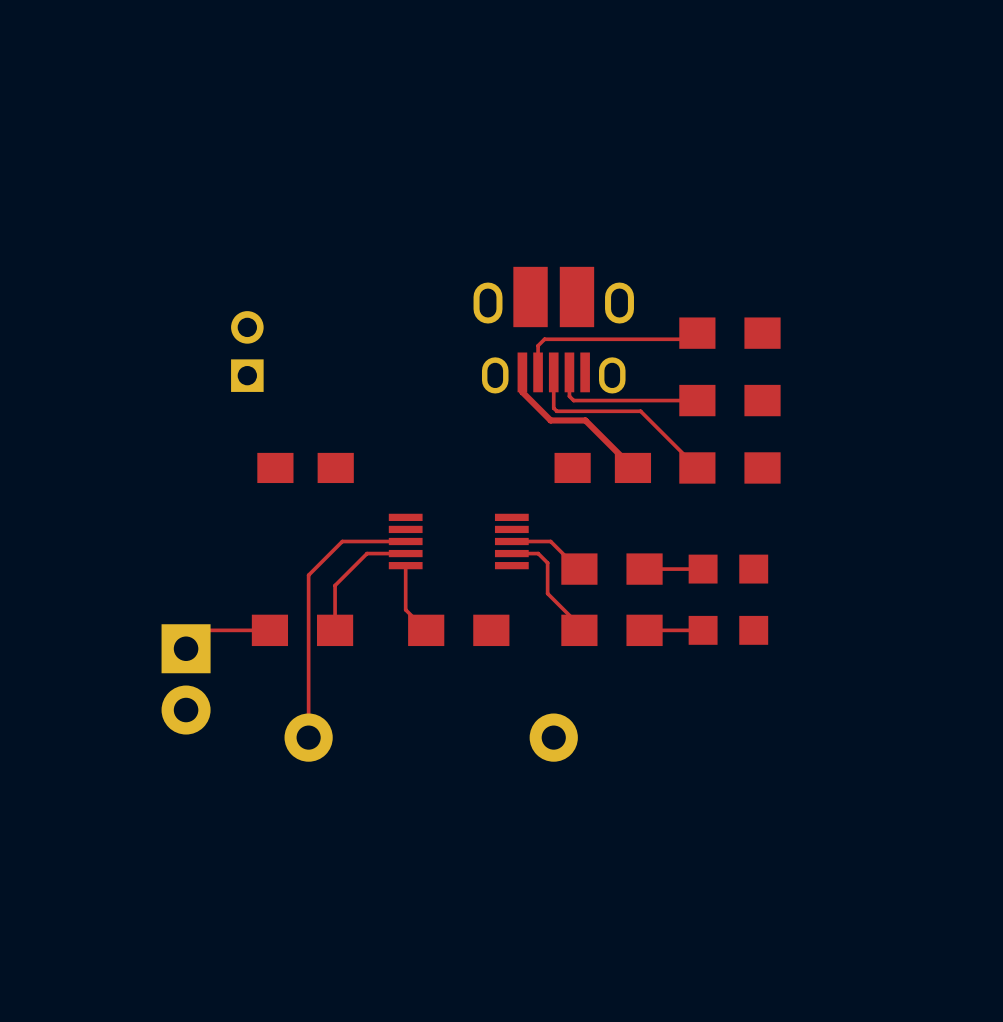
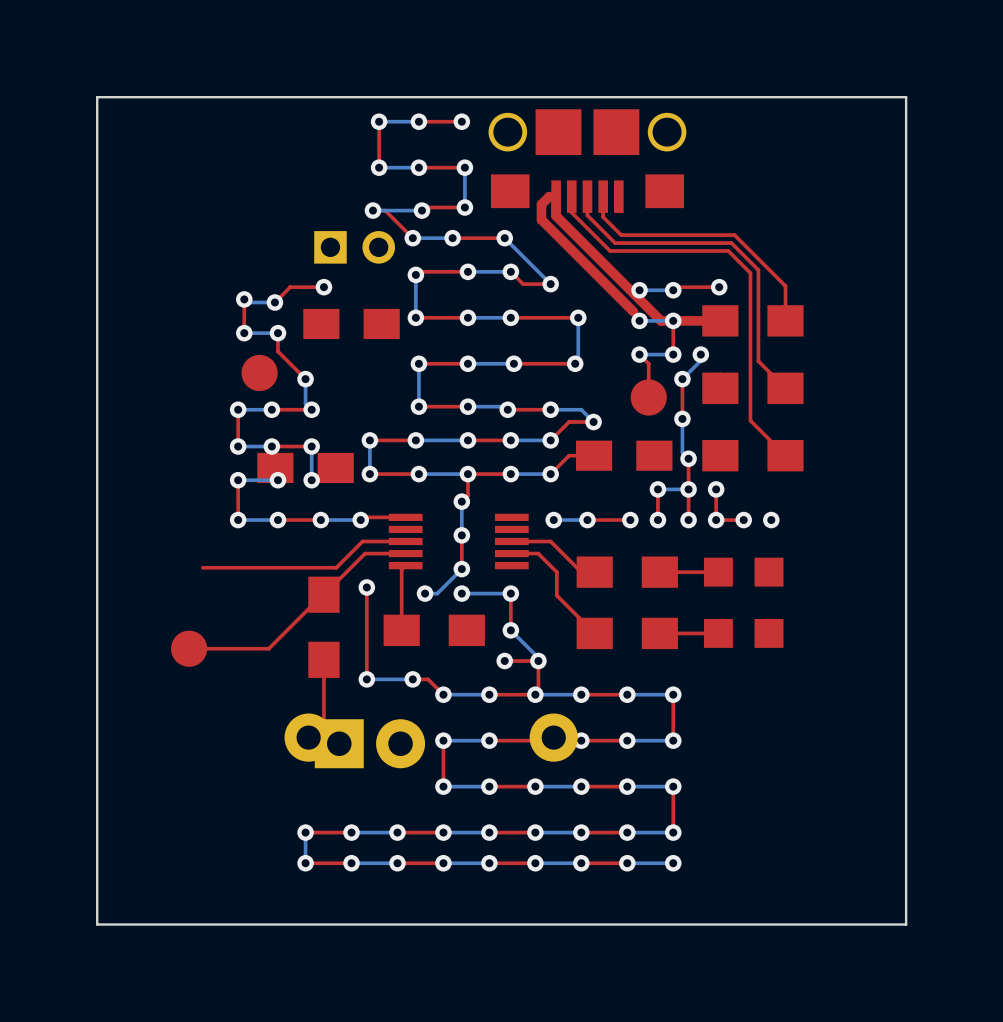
board edge: none -> (906, 97) (906, 924) (97, 924) (97, 97) (906, 97)
top track: none -> (379, 121) (379, 167)
via: none -> (379, 121)
bottom track: none -> (418, 121) (379, 121)
via: none -> (418, 121)
top track: none -> (461, 121) (418, 121)
via: none -> (461, 121)
part: none -> (587, 161)
via: none -> (379, 167)
bottom track: none -> (418, 167) (379, 167)
via: none -> (418, 167)
top track: none -> (464, 167) (418, 167)
bottom track: none -> (464, 167) (464, 207)
via: none -> (464, 167)
top track: none -> (571, 196) (571, 212) (610, 251) (728, 251) (750, 273) (750, 420) (785, 455)
top track: none -> (587, 196) (587, 215) (615, 243) (731, 243) (758, 270) (758, 361) (785, 388)
top track: none -> (603, 196) (603, 217) (621, 235) (734, 235) (785, 286) (785, 320)
top track: none -> (464, 207) (425, 207) (422, 210)
via: none -> (464, 207)
top track: none -> (372, 210) (385, 210) (412, 238)
via: none -> (372, 210)
bottom track: none -> (422, 210) (372, 210)
via: none -> (422, 210)
via: none -> (412, 238)
bottom track: none -> (452, 238) (412, 238)
via: none -> (452, 238)
top track: none -> (504, 238) (452, 238)
bottom track: none -> (504, 238) (550, 284)
via: none -> (504, 238)
top track: none -> (467, 271) (418, 271) (415, 274)
via: none -> (467, 271)
top track: none -> (510, 271) (523, 284) (550, 284)
bottom track: none -> (510, 271) (467, 271)
via: none -> (510, 271)
bottom track: none -> (415, 274) (415, 317)
via: none -> (415, 274)
via: none -> (550, 284)
top track: none -> (323, 287) (290, 287) (274, 302)
via: none -> (323, 287)
top track: none -> (719, 287) (676, 287) (673, 290)
via: none -> (719, 287)
via: none -> (639, 290)
bottom track: none -> (673, 290) (639, 290)
via: none -> (673, 290)
top track: none -> (244, 299) (244, 333)
bottom track: none -> (244, 299) (247, 302) (274, 302)
via: none -> (244, 299)
via: none -> (274, 302)
top track: none -> (633, 311) (541, 219) (541, 204) (549, 196) (556, 196) (556, 215) (661, 320) (720, 320)
via: none -> (415, 317)
top track: none -> (467, 317) (415, 317)
via: none -> (467, 317)
bottom track: none -> (510, 317) (467, 317)
via: none -> (510, 317)
top track: none -> (578, 317) (510, 317)
bottom track: none -> (578, 317) (578, 360) (575, 363)
via: none -> (578, 317)
via: none -> (639, 320)
top track: none -> (673, 320) (673, 354)
bottom track: none -> (673, 320) (639, 320)
via: none -> (673, 320)
part: none -> (351, 323)
part: (553, 330) -> none
via: none -> (244, 333)
top track: none -> (277, 333) (277, 351) (305, 379)
bottom track: none -> (277, 333) (244, 333)
via: none -> (277, 333)
top track: (697, 333) (691, 339) (544, 339) (538, 345) (538, 372) -> none
part position: (729, 333) -> (752, 320)
part rotation: 0° (247, 351) -> 90° clockwise (354, 247)
part position: (247, 351) -> (354, 247)
top track: none -> (639, 354) (648, 363) (648, 397)
via: none -> (639, 354)
bottom track: none -> (673, 354) (639, 354)
via: none -> (673, 354)
bottom track: none -> (700, 354) (700, 360) (682, 379)
via: none -> (700, 354)
bottom track: none -> (418, 363) (418, 406)
via: none -> (418, 363)
top track: none -> (467, 363) (418, 363)
via: none -> (467, 363)
bottom track: none -> (513, 363) (467, 363)
via: none -> (513, 363)
top track: none -> (575, 363) (513, 363)
via: none -> (575, 363)
part: none -> (259, 372)
top track: (522, 372) (522, 392) (550, 420) (585, 420) (632, 467) -> none
top track: (553, 372) (553, 408) (556, 411) (640, 411) (697, 467) -> none
top track: (569, 372) (569, 396) (573, 400) (697, 400) -> none
bottom track: none -> (305, 379) (305, 403) (311, 409)
via: none -> (305, 379)
top track: none -> (682, 379) (682, 418)
via: none -> (682, 379)
part: none -> (648, 397)
part position: (729, 400) -> (752, 388)
via: none -> (418, 406)
top track: none -> (467, 406) (418, 406)
bottom track: none -> (467, 406) (504, 406) (507, 409)
via: none -> (467, 406)
top track: none -> (238, 409) (238, 446)
via: none -> (238, 409)
bottom track: none -> (271, 409) (238, 409)
via: none -> (271, 409)
top track: none -> (311, 409) (271, 409)
via: none -> (311, 409)
via: none -> (507, 409)
top track: none -> (550, 409) (507, 409)
bottom track: none -> (550, 409) (581, 409) (593, 422)
via: none -> (550, 409)
bottom track: none -> (682, 418) (682, 452) (688, 458)
via: none -> (682, 418)
top track: none -> (593, 422) (569, 422) (550, 440)
via: none -> (593, 422)
bottom track: none -> (369, 440) (369, 474)
via: none -> (369, 440)
top track: none -> (415, 440) (369, 440)
via: none -> (415, 440)
bottom track: none -> (467, 440) (415, 440)
via: none -> (467, 440)
top track: none -> (510, 440) (467, 440)
via: none -> (510, 440)
bottom track: none -> (550, 440) (510, 440)
via: none -> (550, 440)
via: none -> (238, 446)
bottom track: none -> (271, 446) (238, 446)
via: none -> (271, 446)
top track: none -> (311, 446) (271, 446)
bottom track: none -> (311, 446) (311, 480)
via: none -> (311, 446)
top track: none -> (594, 455) (569, 455) (550, 474)
top track: none -> (688, 458) (688, 520)
via: none -> (688, 458)
part position: (602, 467) -> (624, 455)
part position: (729, 467) -> (752, 455)
via: none -> (369, 474)
top track: none -> (418, 474) (369, 474)
via: none -> (418, 474)
bottom track: none -> (467, 474) (418, 474)
via: none -> (467, 474)
top track: none -> (510, 474) (467, 474) (467, 495) (461, 501)
via: none -> (510, 474)
bottom track: none -> (550, 474) (510, 474)
via: none -> (550, 474)
top track: none -> (238, 480) (238, 520)
via: none -> (238, 480)
bottom track: none -> (277, 480) (238, 480)
via: none -> (277, 480)
via: none -> (311, 480)
top track: none -> (657, 489) (657, 520)
via: none -> (657, 489)
bottom track: none -> (688, 489) (657, 489)
via: none -> (688, 489)
top track: none -> (716, 489) (716, 520) (743, 520)
via: none -> (716, 489)
bottom track: none -> (461, 501) (461, 535)
via: none -> (461, 501)
top track: none -> (405, 517) (363, 517) (360, 520)
via: none -> (238, 520)
bottom track: none -> (277, 520) (238, 520)
via: none -> (277, 520)
top track: none -> (320, 520) (277, 520)
via: none -> (320, 520)
bottom track: none -> (360, 520) (320, 520)
via: none -> (360, 520)
via: none -> (553, 520)
bottom track: none -> (587, 520) (553, 520)
via: none -> (587, 520)
top track: none -> (630, 520) (587, 520)
via: none -> (630, 520)
via: none -> (657, 520)
via: none -> (688, 520)
via: none -> (716, 520)
via: none -> (743, 520)
via: none -> (771, 520)
top track: none -> (461, 535) (461, 569)
via: none -> (461, 535)
top track: (362, 541) (342, 541) (308, 575) (308, 737) -> (362, 541) (336, 567) (202, 567)
top track: (367, 553) (335, 585) (335, 630) -> (367, 553) (268, 648) (189, 648)
top track: (547, 562) (547, 593) (579, 625) -> (547, 562) (556, 572) (556, 595) (594, 633)
top track: (405, 565) (405, 609) (426, 630) -> (405, 565) (401, 569) (401, 630)
bottom track: none -> (461, 569) (437, 593) (425, 593)
via: none -> (461, 569)
part position: (611, 569) -> (627, 572)
top track: (703, 569) (644, 569) -> (718, 572) (659, 572)
part position: (728, 569) -> (743, 572)
top track: none -> (366, 587) (366, 679)
via: none -> (366, 587)
via: none -> (425, 593)
via: none -> (461, 593)
top track: none -> (510, 593) (510, 630)
bottom track: none -> (510, 593) (461, 593)
via: none -> (510, 593)
top track: (269, 630) (204, 630) (186, 648) -> none
part rotation: 0° (302, 630) -> 90° clockwise (323, 627)
part position: (458, 630) -> (434, 630)
bottom track: none -> (510, 630) (538, 657) (538, 661)
via: none -> (510, 630)
part position: (611, 630) -> (627, 633)
top track: (703, 630) (644, 630) -> (718, 633) (659, 633)
part position: (728, 630) -> (743, 633)
part: none -> (189, 648)
top track: none -> (323, 659) (323, 728) (339, 743)
top track: none -> (504, 661) (538, 661) (538, 691) (535, 694) (489, 694)
via: none -> (504, 661)
via: none -> (538, 661)
part rotation: 0° (186, 679) -> 90° counterclockwise (369, 743)
part position: (186, 679) -> (369, 743)
via: none -> (366, 679)
top track: none -> (412, 679) (428, 679) (443, 694)
bottom track: none -> (412, 679) (366, 679)
via: none -> (412, 679)
via: none -> (443, 694)
bottom track: none -> (489, 694) (443, 694)
via: none -> (489, 694)
via: none -> (535, 694)
bottom track: none -> (581, 694) (535, 694)
via: none -> (581, 694)
top track: none -> (627, 694) (581, 694)
via: none -> (627, 694)
top track: none -> (673, 694) (673, 740)
bottom track: none -> (673, 694) (627, 694)
via: none -> (673, 694)
top track: none -> (443, 740) (443, 786)
via: none -> (443, 740)
bottom track: none -> (489, 740) (443, 740)
via: none -> (489, 740)
top track: none -> (535, 740) (489, 740)
via: none -> (581, 740)
top track: none -> (627, 740) (581, 740)
via: none -> (627, 740)
bottom track: none -> (673, 740) (627, 740)
via: none -> (673, 740)
via: none -> (443, 786)
bottom track: none -> (489, 786) (443, 786)
via: none -> (489, 786)
top track: none -> (535, 786) (489, 786)
via: none -> (535, 786)
bottom track: none -> (581, 786) (535, 786)
via: none -> (581, 786)
top track: none -> (627, 786) (581, 786)
via: none -> (627, 786)
top track: none -> (673, 786) (673, 832)
bottom track: none -> (673, 786) (627, 786)
via: none -> (673, 786)
bottom track: none -> (305, 832) (305, 863)
via: none -> (305, 832)
top track: none -> (351, 832) (305, 832)
via: none -> (351, 832)
bottom track: none -> (397, 832) (351, 832)
via: none -> (397, 832)
top track: none -> (443, 832) (397, 832)
via: none -> (443, 832)
bottom track: none -> (489, 832) (443, 832)
via: none -> (489, 832)
top track: none -> (535, 832) (489, 832)
via: none -> (535, 832)
bottom track: none -> (581, 832) (535, 832)
via: none -> (581, 832)
top track: none -> (627, 832) (581, 832)
via: none -> (627, 832)
bottom track: none -> (673, 832) (627, 832)
via: none -> (673, 832)
via: none -> (305, 863)
top track: none -> (351, 863) (305, 863)
via: none -> (351, 863)
bottom track: none -> (397, 863) (351, 863)
via: none -> (397, 863)
top track: none -> (443, 863) (397, 863)
via: none -> (443, 863)
bottom track: none -> (489, 863) (443, 863)
via: none -> (489, 863)
top track: none -> (535, 863) (489, 863)
via: none -> (535, 863)
bottom track: none -> (581, 863) (535, 863)
via: none -> (581, 863)
top track: none -> (627, 863) (581, 863)
via: none -> (627, 863)
bottom track: none -> (673, 863) (627, 863)
via: none -> (673, 863)

